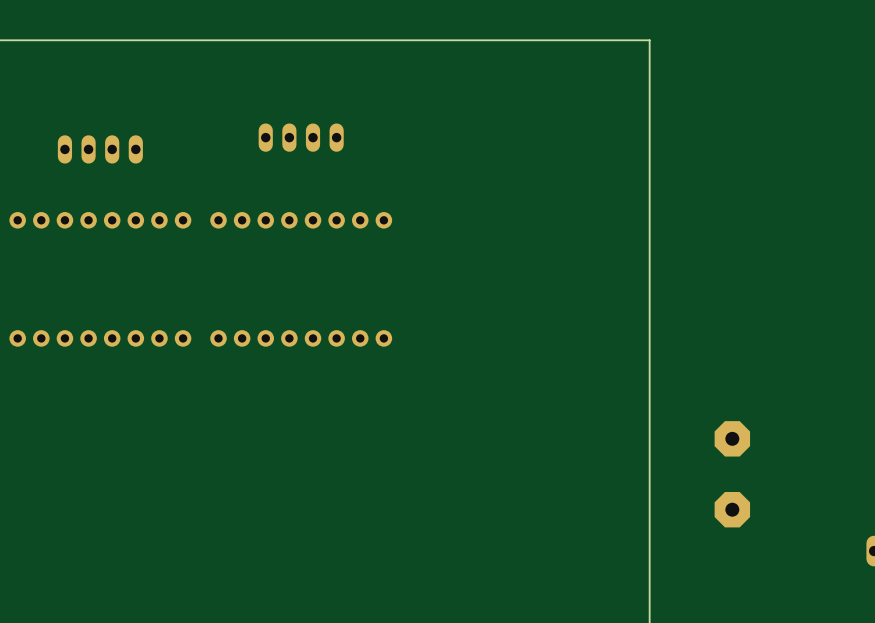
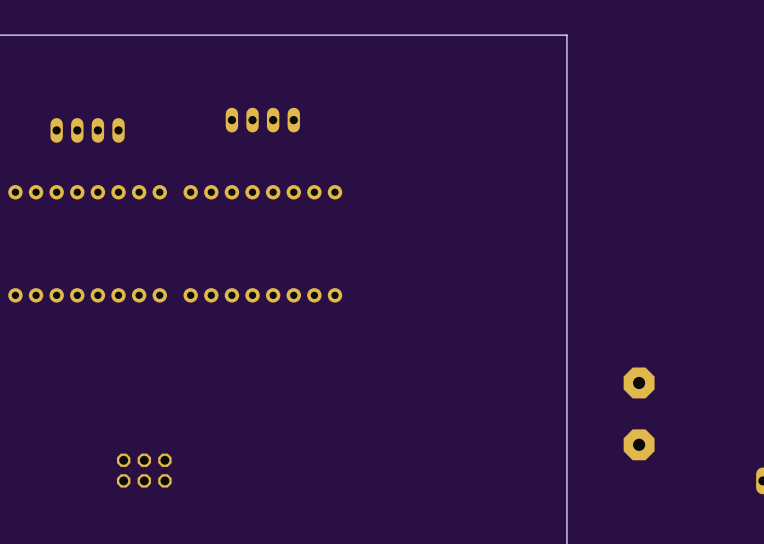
part: none -> (144, 470)

